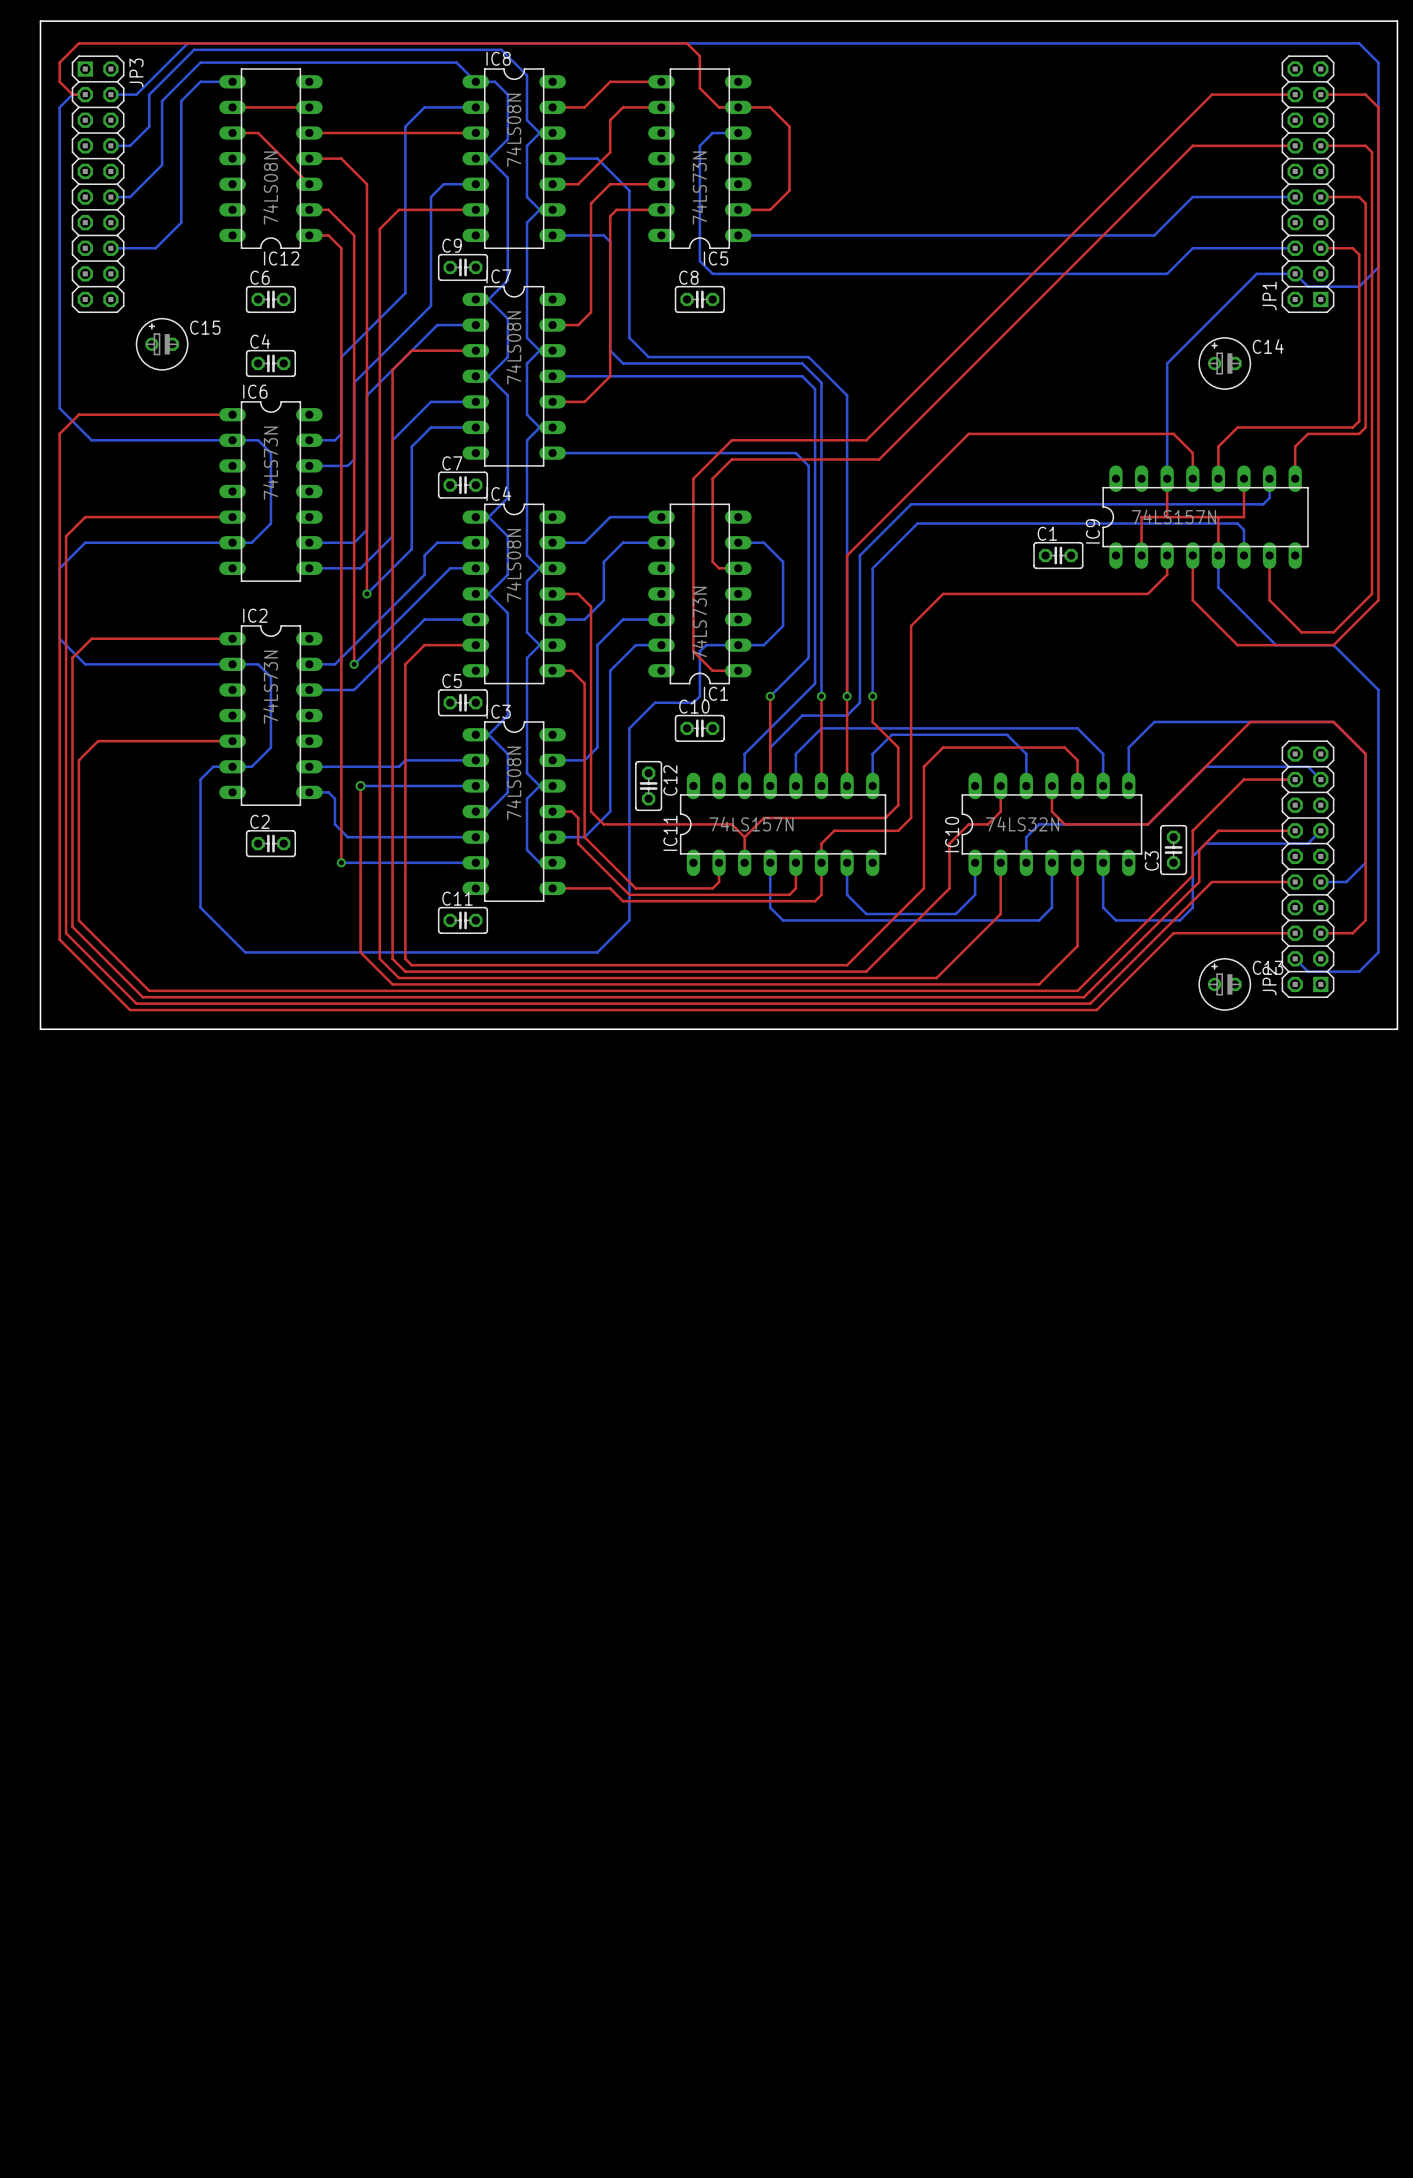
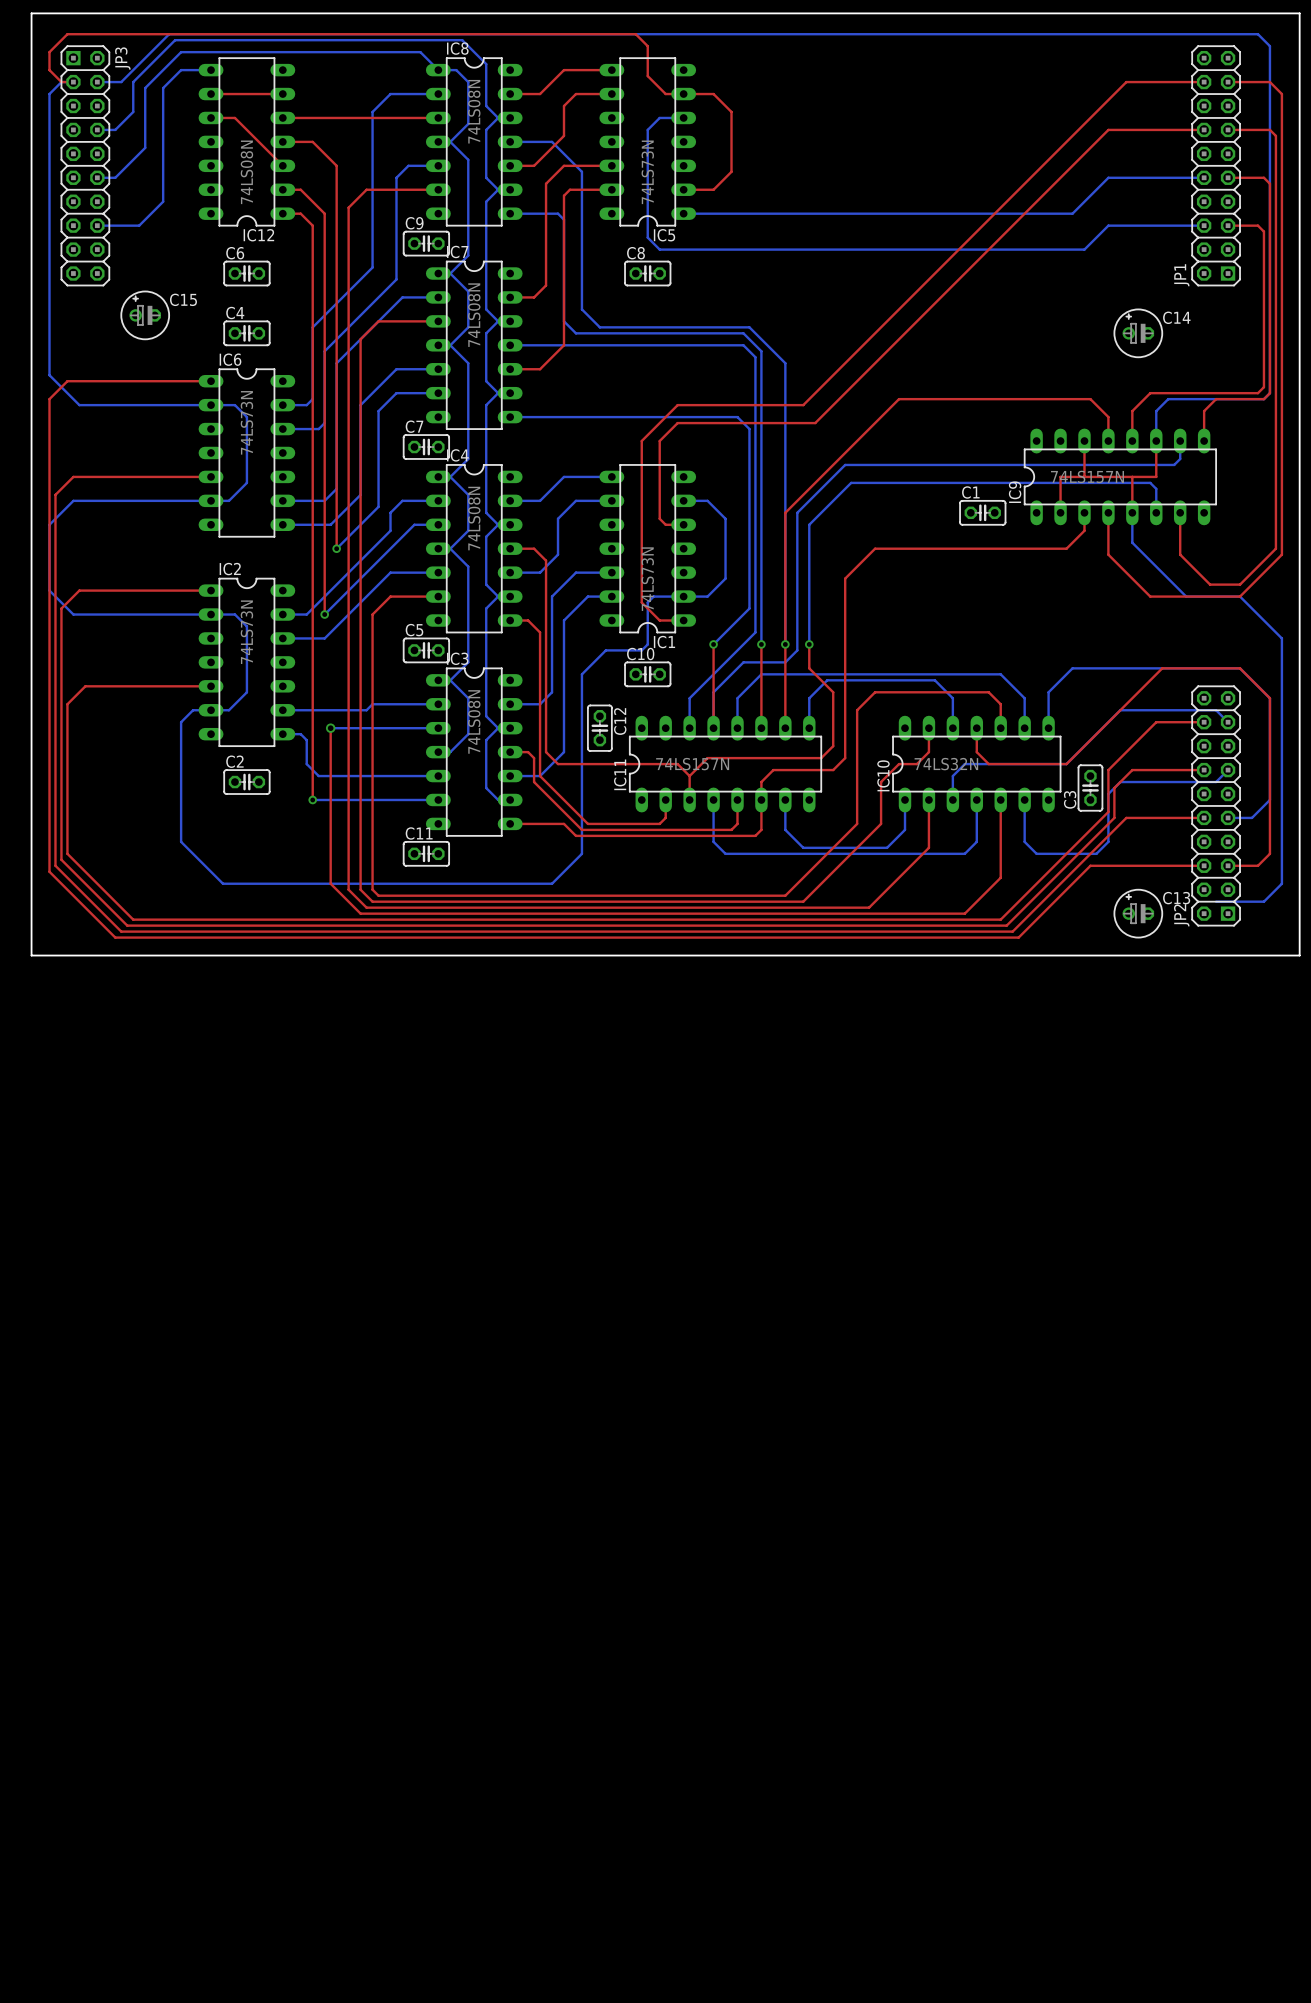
bottom track: (1352, 43) (1359, 43) (1378, 62) (1378, 267) (1359, 286) (1308, 286) (1295, 273) (1256, 273) (1167, 363) (1167, 478) -> (1257, 34) (1269, 46) (1269, 393) (1263, 399) (1168, 399) (1156, 411) (1156, 441)
bottom track: (1295, 958) (1308, 971) -> none

